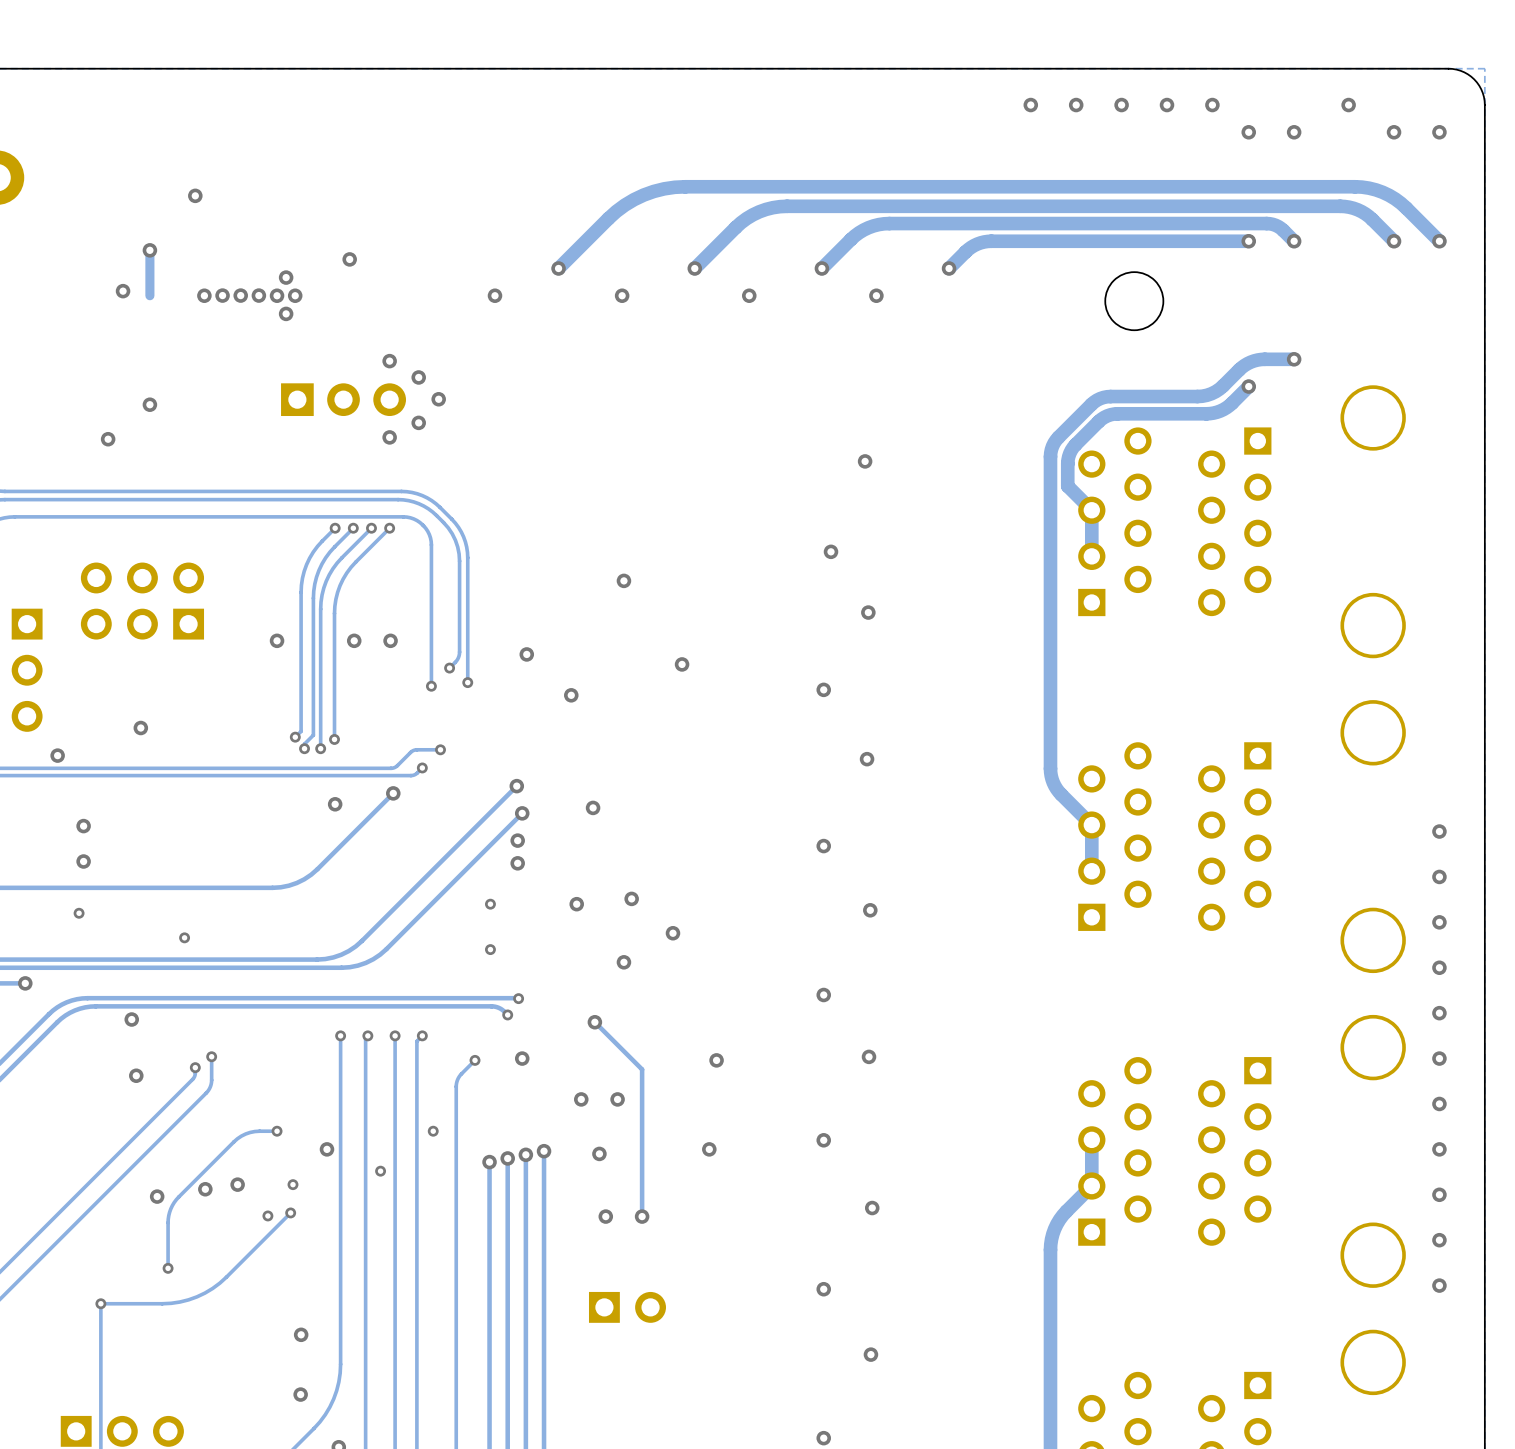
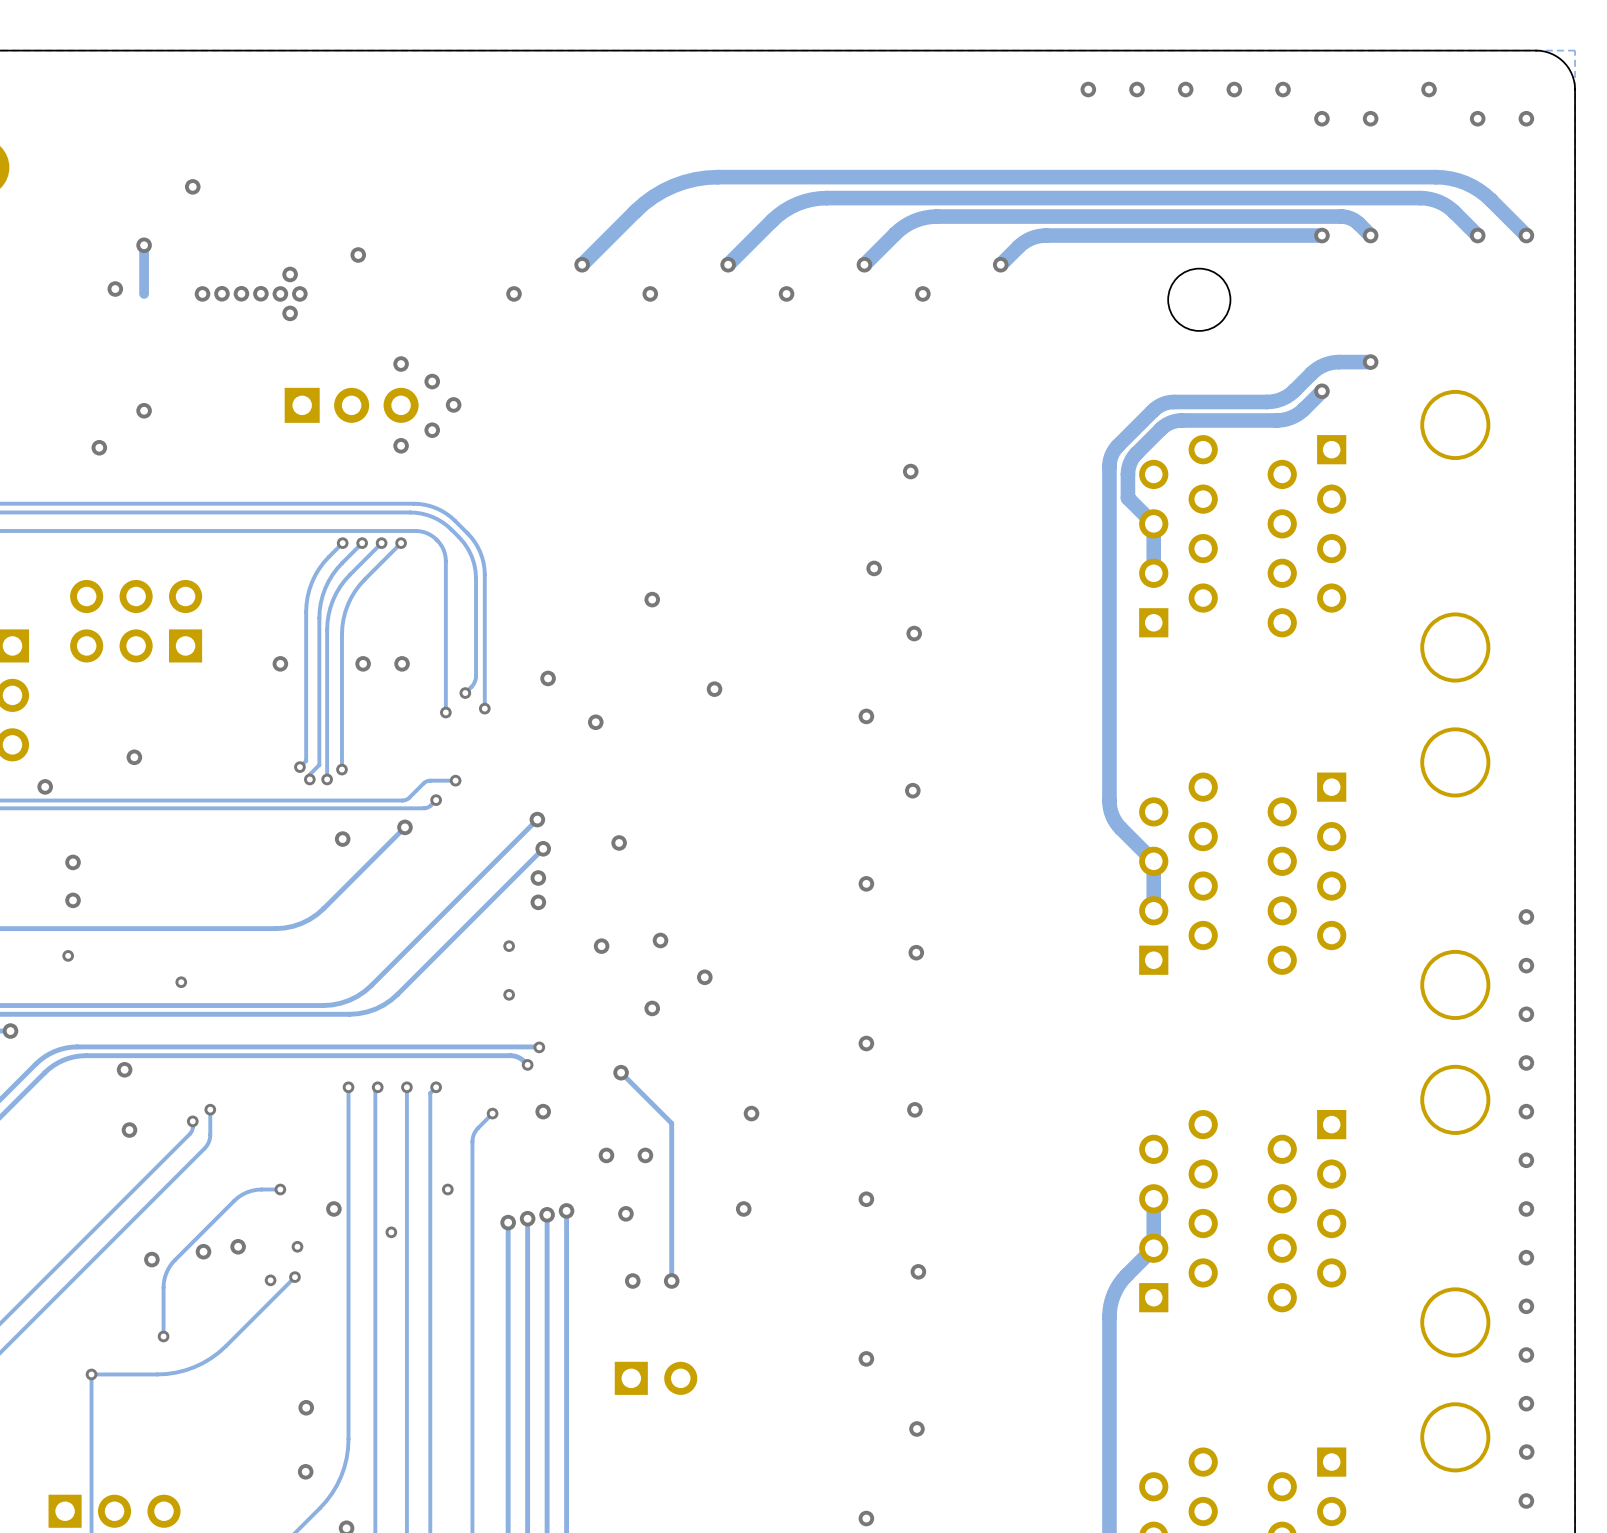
via: (1439, 831) -> none
via: none -> (1526, 1403)
via: none -> (1526, 1452)
via: none -> (1526, 1501)

